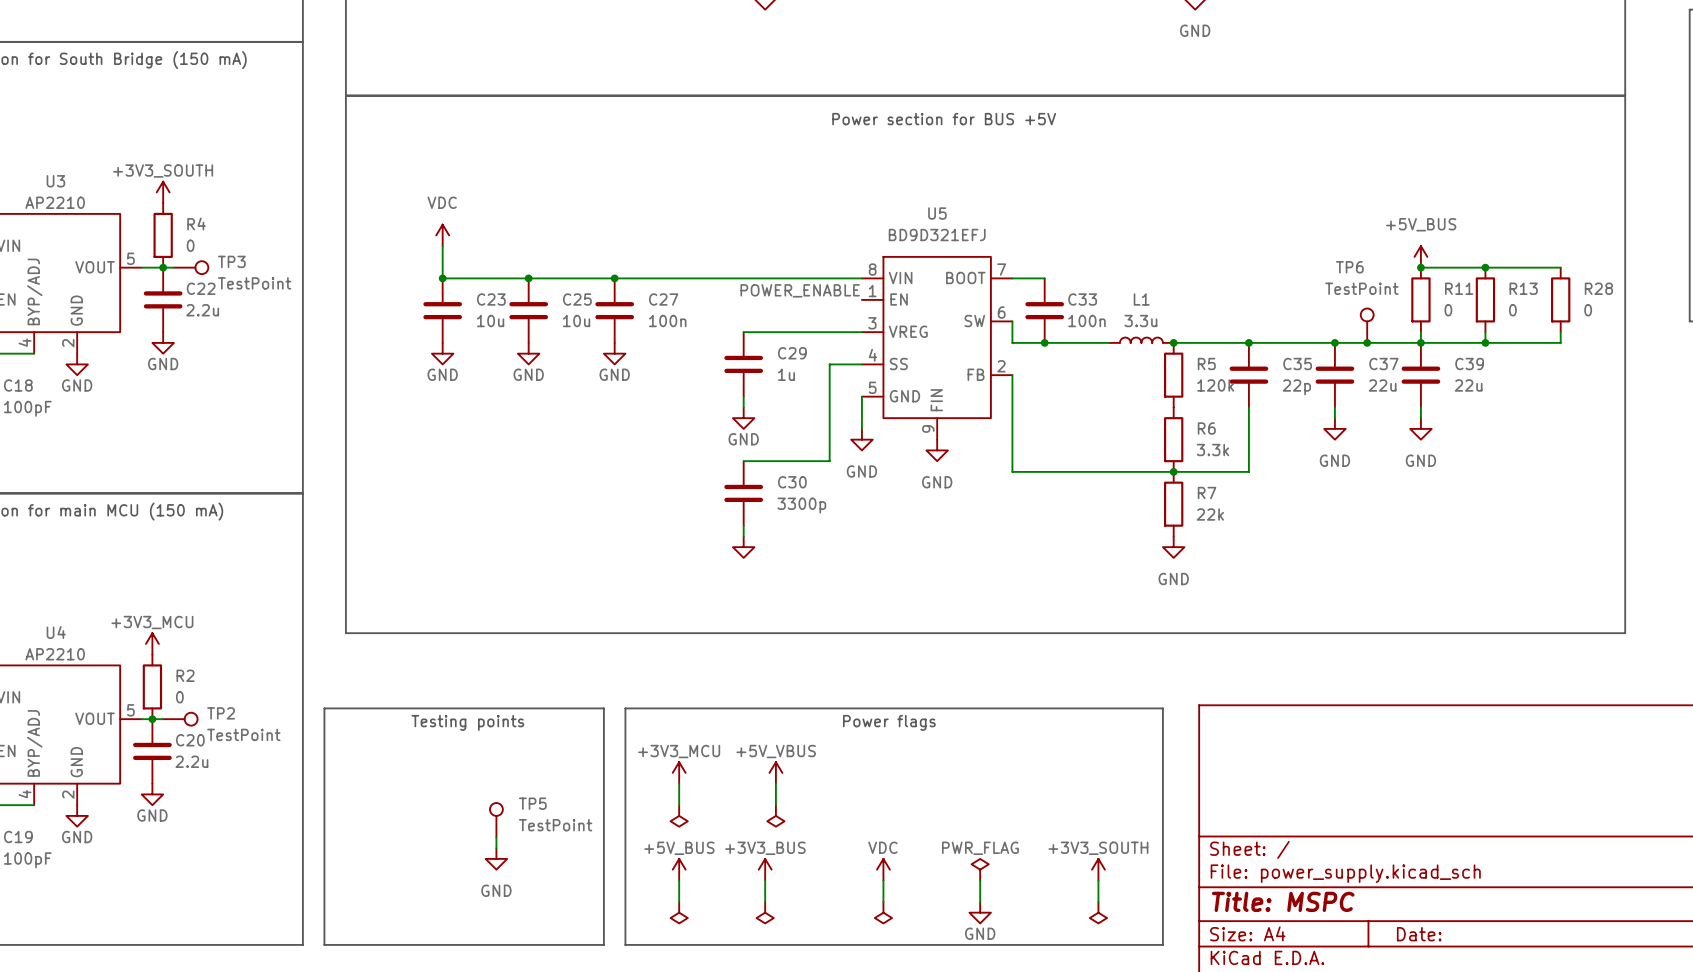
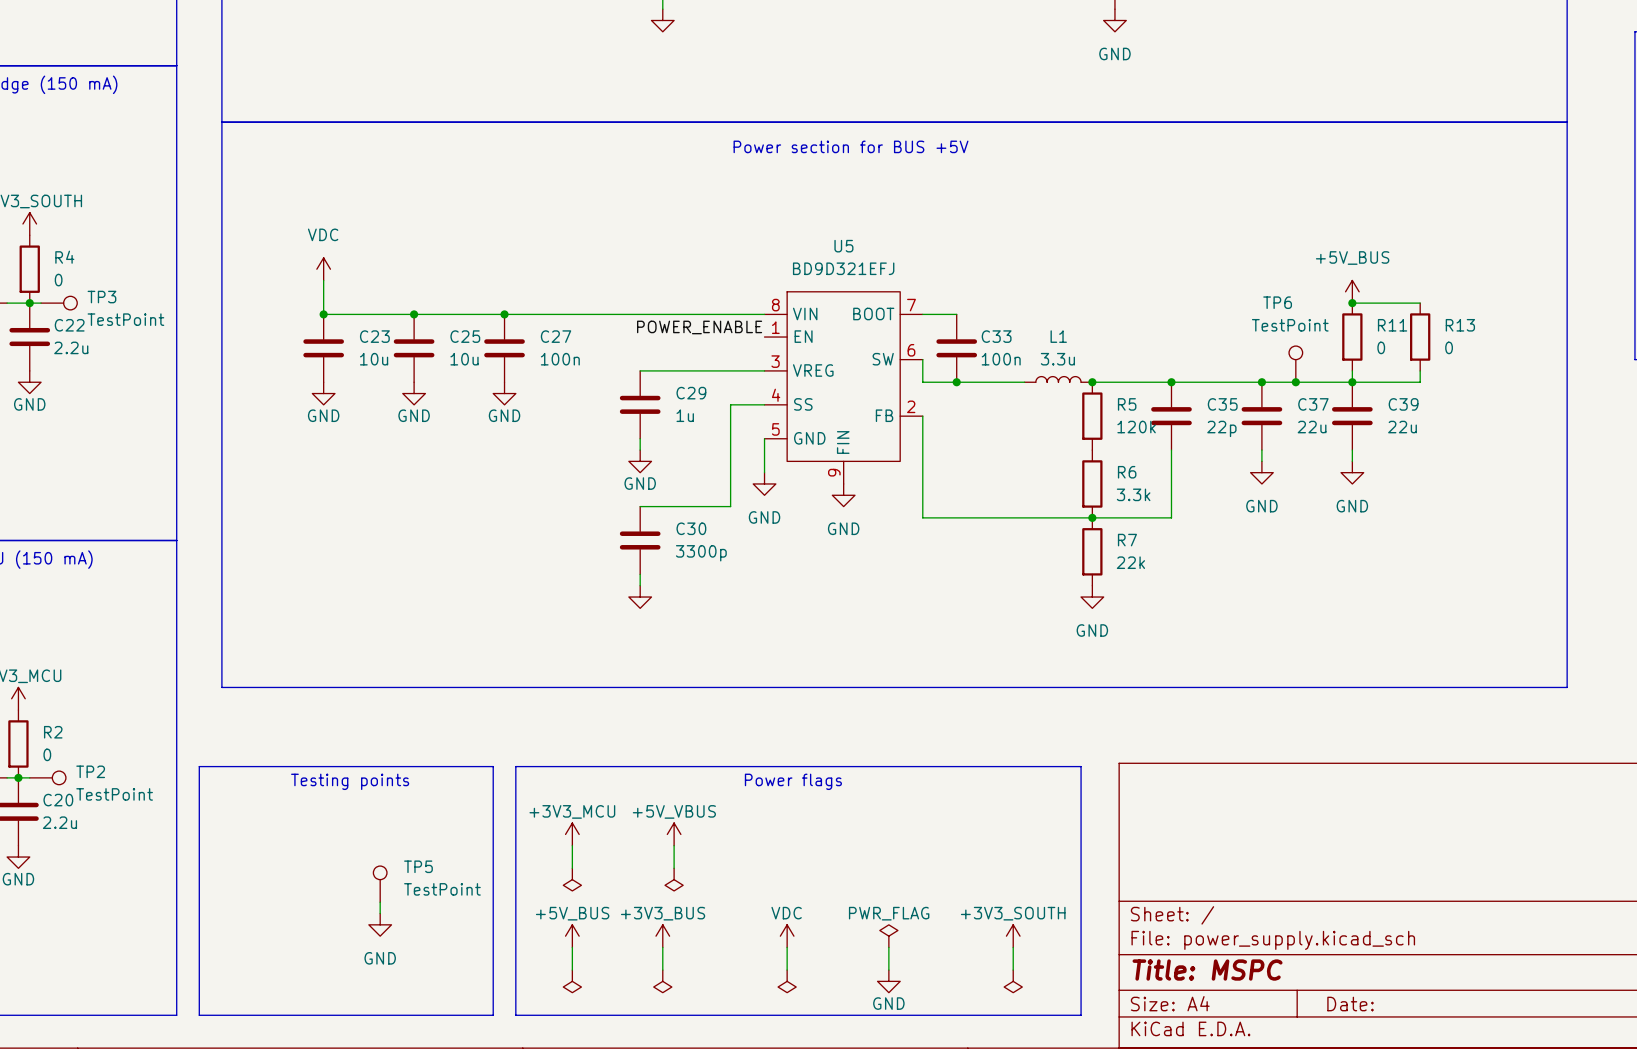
wire: (1485, 267) (1560, 267) -> none
junction: (1485, 267) -> none
R28: 0 (1560, 299) -> none
wire: (1560, 332) (1560, 342) (1485, 342) -> none
junction: (1485, 342) -> none

